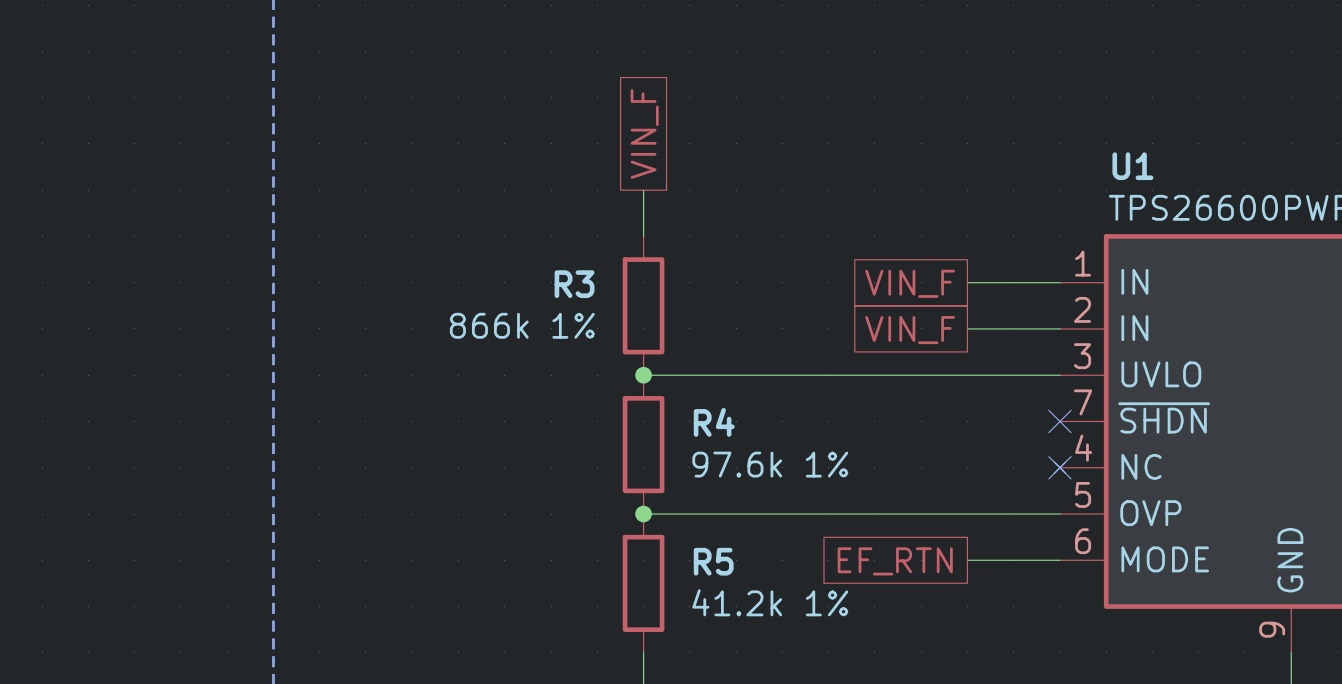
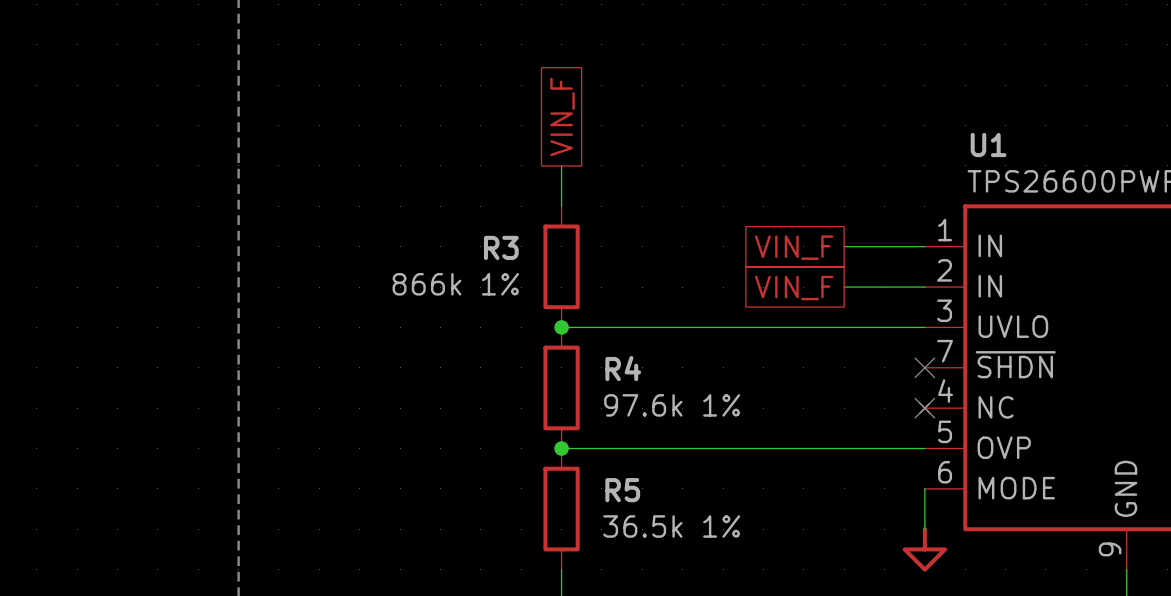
wire: (967, 560) (1059, 560) -> (924, 529) (924, 488)
global label: EF_RTN (895, 561) -> none
R5 value: 41.2k 1% (770, 602) -> 36.5k 1% (671, 526)
power symbol: none -> (924, 549)

